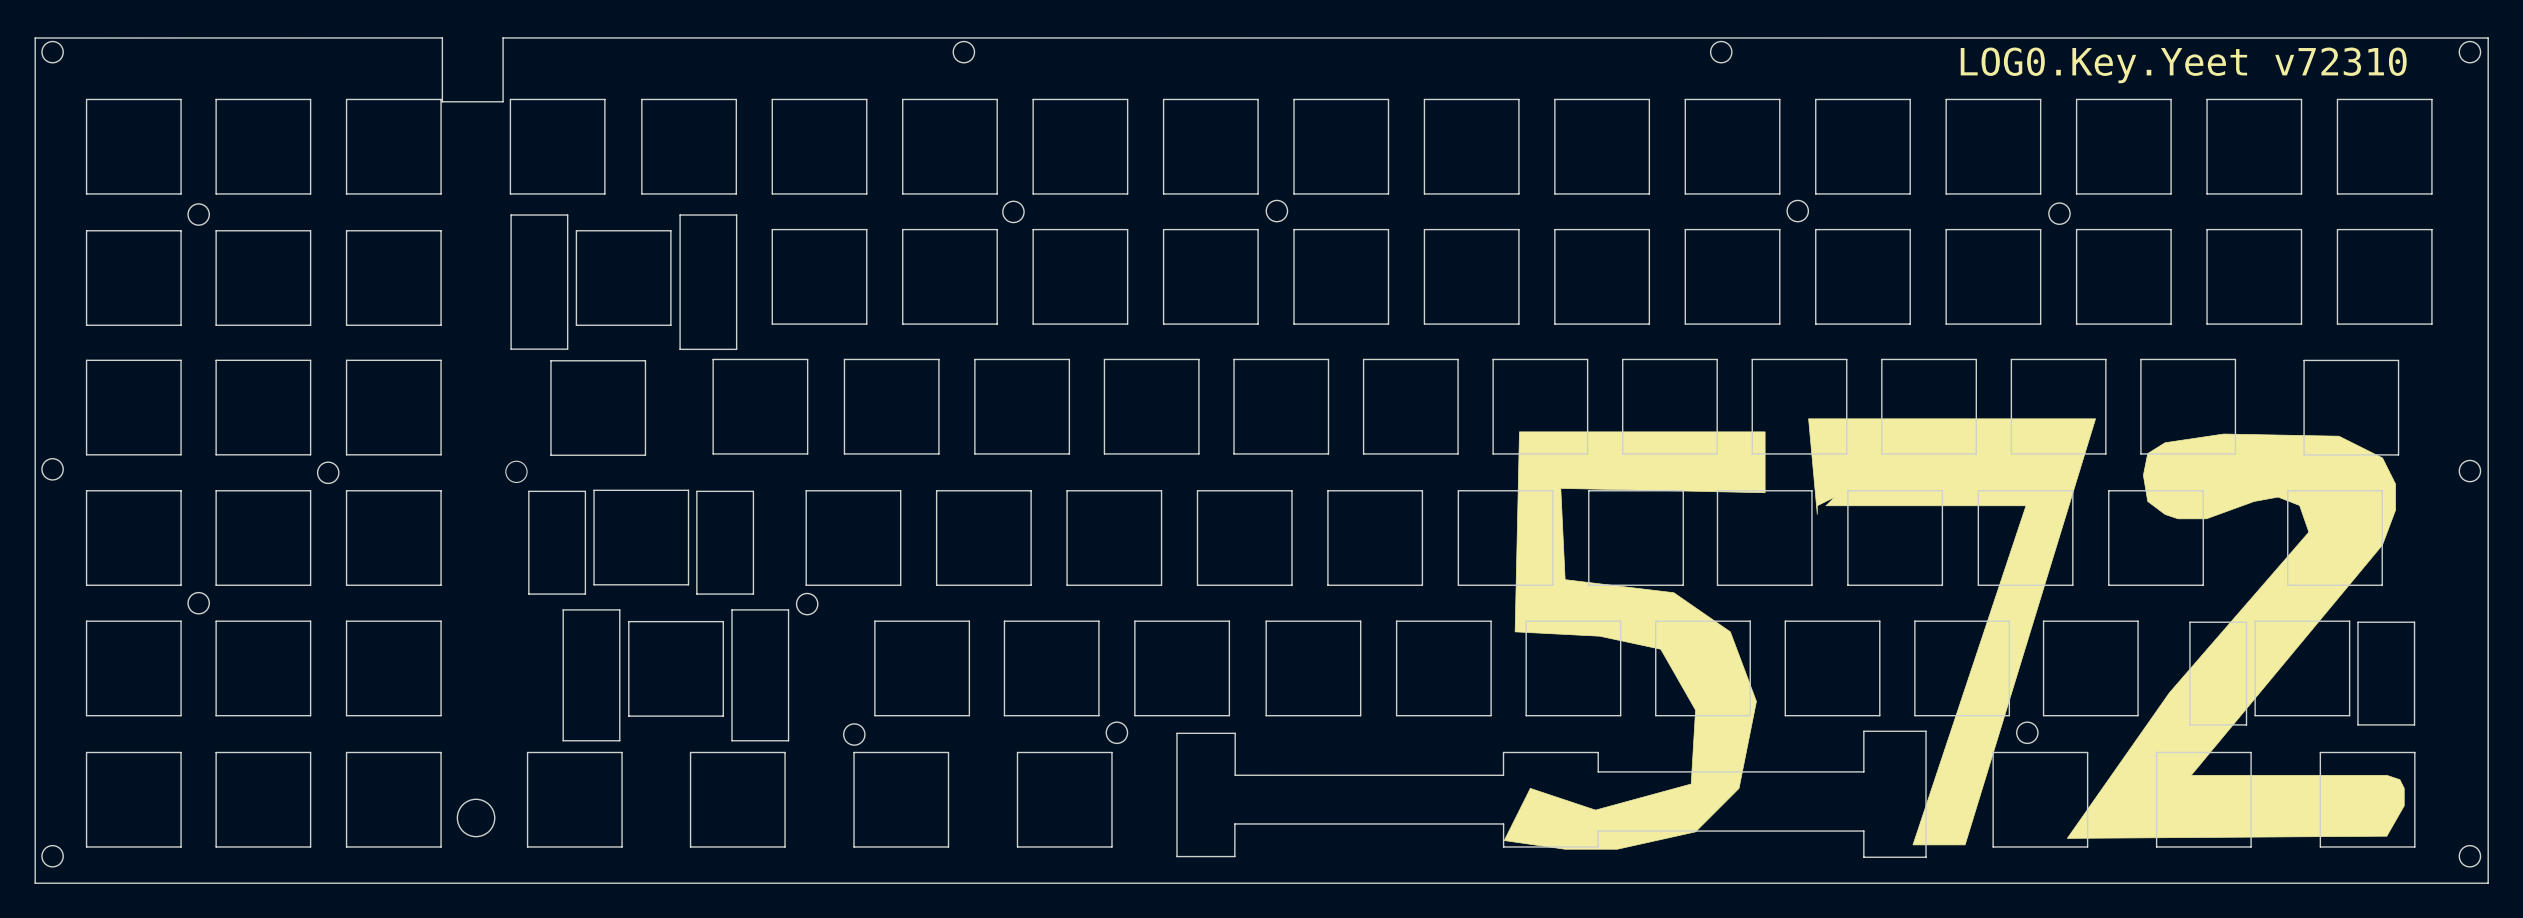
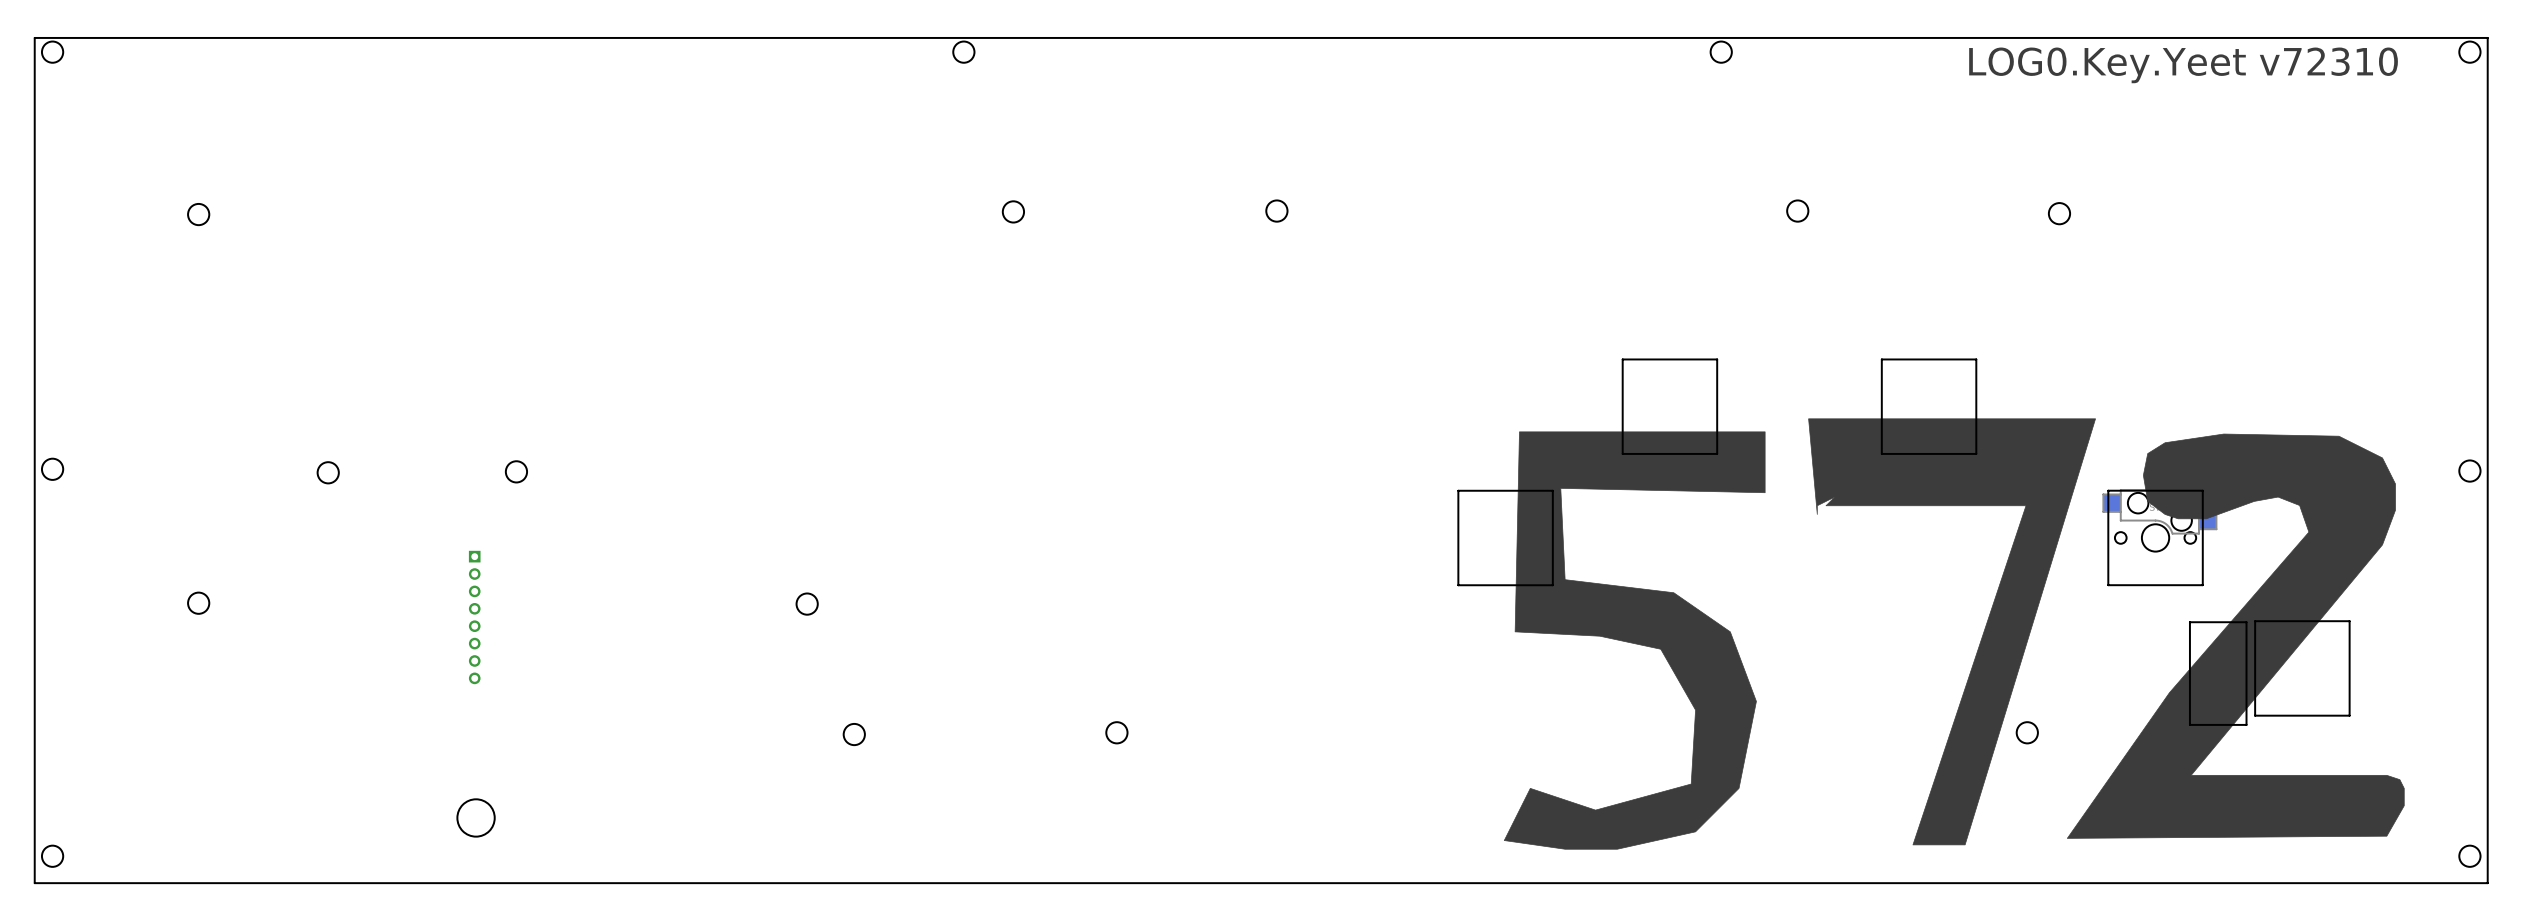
board edge: (503, 37) (503, 101) (442, 101) (442, 37) (35, 38) (35, 883) (2488, 883) (2488, 38) (503, 37) -> (2487, 37) (2487, 883) (34, 883) (34, 37) (2487, 37)
board edge: (181, 99) (86, 99) (86, 193) (181, 193) (181, 99) -> none
board edge: (310, 99) (216, 99) (216, 193) (310, 193) (310, 99) -> none
board edge: (441, 99) (346, 99) (346, 193) (441, 193) (441, 99) -> none
board edge: (604, 99) (510, 99) (510, 193) (604, 193) (604, 99) -> none
board edge: (736, 99) (641, 99) (641, 193) (736, 193) (736, 99) -> none
board edge: (866, 99) (772, 99) (772, 193) (866, 193) (866, 99) -> none
board edge: (997, 99) (902, 99) (902, 193) (997, 193) (997, 99) -> none
board edge: (1127, 99) (1033, 99) (1033, 193) (1127, 193) (1127, 99) -> none
board edge: (1258, 99) (1163, 99) (1163, 193) (1258, 193) (1258, 99) -> none
board edge: (1388, 99) (1294, 99) (1294, 193) (1388, 193) (1388, 99) -> none
board edge: (1518, 99) (1424, 99) (1424, 193) (1518, 193) (1518, 99) -> none
board edge: (1649, 99) (1554, 99) (1554, 193) (1649, 193) (1649, 99) -> none
board edge: (1779, 99) (1685, 99) (1685, 193) (1779, 193) (1779, 99) -> none
board edge: (1910, 99) (1910, 193) (1815, 193) (1815, 99) (1910, 99) -> none
board edge: (2040, 99) (1946, 99) (1946, 193) (2040, 193) (2040, 99) -> none
board edge: (2171, 99) (2076, 99) (2076, 193) (2171, 193) (2171, 99) -> none
board edge: (2301, 99) (2207, 99) (2207, 193) (2301, 193) (2301, 99) -> none
board edge: (2431, 99) (2337, 99) (2337, 193) (2431, 193) (2431, 99) -> none
board edge: (567, 215) (567, 349) (511, 349) (511, 215) (567, 215) -> none
board edge: (736, 215) (736, 349) (680, 349) (680, 215) (736, 215) -> none
board edge: (866, 229) (772, 229) (772, 324) (866, 324) (866, 229) -> none
board edge: (997, 229) (902, 229) (902, 324) (997, 324) (997, 229) -> none
board edge: (1127, 229) (1033, 229) (1033, 324) (1127, 324) (1127, 229) -> none
board edge: (1258, 229) (1163, 229) (1163, 324) (1258, 324) (1258, 229) -> none
board edge: (1388, 229) (1294, 229) (1294, 324) (1388, 324) (1388, 229) -> none
board edge: (1518, 229) (1518, 324) (1424, 324) (1424, 229) (1518, 229) -> none
board edge: (1649, 229) (1554, 229) (1554, 324) (1649, 324) (1649, 229) -> none
board edge: (1779, 229) (1685, 229) (1685, 324) (1779, 324) (1779, 229) -> none
board edge: (1910, 229) (1910, 324) (1815, 324) (1815, 229) (1910, 229) -> none
board edge: (2040, 229) (1946, 229) (1946, 324) (2040, 324) (2040, 229) -> none
board edge: (2171, 229) (2076, 229) (2076, 324) (2171, 324) (2171, 229) -> none
board edge: (2301, 229) (2301, 324) (2207, 324) (2207, 229) (2301, 229) -> none
board edge: (2431, 229) (2337, 229) (2337, 324) (2431, 324) (2431, 229) -> none
board edge: (181, 230) (86, 230) (86, 325) (181, 325) (181, 230) -> none
board edge: (310, 230) (216, 230) (216, 325) (310, 325) (310, 230) -> none
board edge: (441, 230) (346, 230) (346, 325) (441, 325) (441, 230) -> none
board edge: (670, 230) (576, 230) (576, 325) (670, 325) (670, 230) -> none
board edge: (807, 359) (713, 359) (713, 453) (807, 453) (807, 359) -> none
board edge: (938, 359) (844, 359) (844, 453) (938, 453) (938, 359) -> none
board edge: (1069, 359) (974, 359) (974, 453) (1069, 453) (1069, 359) -> none
board edge: (1198, 359) (1198, 453) (1104, 453) (1104, 359) (1198, 359) -> none
board edge: (1328, 359) (1234, 359) (1234, 453) (1328, 453) (1328, 359) -> none
board edge: (1458, 359) (1363, 359) (1363, 453) (1458, 453) (1458, 359) -> none
board edge: (1587, 359) (1493, 359) (1493, 453) (1587, 453) (1587, 359) -> none
board edge: (1846, 359) (1752, 359) (1752, 453) (1846, 453) (1846, 359) -> none
board edge: (2105, 359) (2011, 359) (2011, 453) (2105, 453) (2105, 359) -> none
board edge: (2235, 359) (2140, 359) (2140, 453) (2235, 453) (2235, 359) -> none
board edge: (181, 360) (181, 454) (86, 454) (86, 360) (181, 360) -> none
board edge: (310, 360) (310, 454) (216, 454) (216, 360) (310, 360) -> none
board edge: (441, 360) (441, 454) (346, 454) (346, 360) (441, 360) -> none
board edge: (645, 360) (550, 360) (550, 455) (645, 455) (645, 360) -> none
board edge: (2398, 360) (2304, 360) (2304, 454) (2398, 454) (2398, 360) -> none
board edge: (181, 490) (86, 490) (86, 585) (181, 585) (181, 490) -> none
board edge: (310, 490) (216, 490) (216, 585) (310, 585) (310, 490) -> none
board edge: (441, 490) (346, 490) (346, 585) (441, 585) (441, 490) -> none
board edge: (688, 490) (688, 584) (594, 584) (594, 490) (688, 490) -> none
board edge: (900, 490) (806, 490) (806, 585) (900, 585) (900, 490) -> none
board edge: (1031, 490) (936, 490) (936, 585) (1031, 585) (1031, 490) -> none
board edge: (1161, 490) (1067, 490) (1067, 585) (1161, 585) (1161, 490) -> none
board edge: (1291, 490) (1197, 490) (1197, 585) (1291, 585) (1291, 490) -> none
board edge: (1422, 490) (1327, 490) (1327, 585) (1422, 585) (1422, 490) -> none
board edge: (1683, 490) (1588, 490) (1588, 585) (1683, 585) (1683, 490) -> none
board edge: (1811, 490) (1717, 490) (1717, 585) (1811, 585) (1811, 490) -> none
board edge: (1942, 490) (1847, 490) (1847, 585) (1942, 585) (1942, 490) -> none
board edge: (2072, 490) (1978, 490) (1978, 585) (2072, 585) (2072, 490) -> none
board edge: (2203, 490) (2108, 490) (2108, 585) (2203, 585) (2203, 490) -> none
board edge: (2382, 490) (2287, 490) (2287, 585) (2382, 585) (2382, 490) -> none
board edge: (585, 491) (528, 491) (528, 594) (585, 594) (585, 491) -> none
board edge: (753, 491) (753, 594) (696, 594) (696, 491) (753, 491) -> none
part: none -> (2159, 537)
board edge: (619, 609) (619, 740) (563, 740) (563, 609) (619, 609) -> none
board edge: (788, 609) (788, 740) (731, 740) (731, 609) (788, 609) -> none
part: none -> (474, 617)
board edge: (181, 621) (86, 621) (86, 715) (181, 715) (181, 621) -> none
board edge: (310, 621) (216, 621) (216, 715) (310, 715) (310, 621) -> none
board edge: (441, 621) (346, 621) (346, 715) (441, 715) (441, 621) -> none
board edge: (723, 621) (628, 621) (628, 716) (723, 716) (723, 621) -> none
board edge: (969, 621) (874, 621) (874, 715) (969, 715) (969, 621) -> none
board edge: (1098, 621) (1004, 621) (1004, 715) (1098, 715) (1098, 621) -> none
board edge: (1229, 621) (1134, 621) (1134, 715) (1229, 715) (1229, 621) -> none
board edge: (1360, 621) (1266, 621) (1266, 715) (1360, 715) (1360, 621) -> none
board edge: (1491, 621) (1396, 621) (1396, 715) (1491, 715) (1491, 621) -> none
board edge: (1620, 621) (1526, 621) (1526, 715) (1620, 715) (1620, 621) -> none
board edge: (1750, 621) (1655, 621) (1655, 715) (1750, 715) (1750, 621) -> none
board edge: (1879, 621) (1785, 621) (1785, 715) (1879, 715) (1879, 621) -> none
board edge: (2009, 621) (1914, 621) (1914, 715) (2009, 715) (2009, 621) -> none
board edge: (2138, 621) (2043, 621) (2043, 715) (2138, 715) (2138, 621) -> none
board edge: (2414, 622) (2357, 622) (2357, 724) (2414, 724) (2414, 622) -> none
board edge: (181, 752) (86, 752) (86, 846) (181, 846) (181, 752) -> none
board edge: (310, 752) (216, 752) (216, 846) (310, 846) (310, 752) -> none
board edge: (441, 752) (346, 752) (346, 846) (441, 846) (441, 752) -> none
board edge: (622, 752) (527, 752) (527, 846) (622, 846) (622, 752) -> none
board edge: (785, 752) (785, 846) (690, 846) (690, 752) (785, 752) -> none
board edge: (948, 752) (854, 752) (854, 846) (948, 846) (948, 752) -> none
board edge: (1111, 752) (1017, 752) (1017, 846) (1111, 846) (1111, 752) -> none
board edge: (1503, 752) (1598, 752) (1598, 771) (1863, 771) (1863, 731) (1926, 731) (1926, 857) (1863, 857) (1863, 831) (1598, 831) (1598, 846) (1503, 846) (1503, 824) -> none
board edge: (1503, 752) (1503, 775) (1235, 775) (1235, 733) (1176, 733) (1176, 856) (1234, 856) (1234, 823) (1503, 823) -> none
board edge: (2087, 752) (1993, 752) (1993, 846) (2087, 846) (2087, 752) -> none
board edge: (2251, 752) (2156, 752) (2156, 846) (2251, 846) (2251, 752) -> none
board edge: (2414, 752) (2320, 752) (2320, 846) (2414, 846) (2414, 752) -> none

